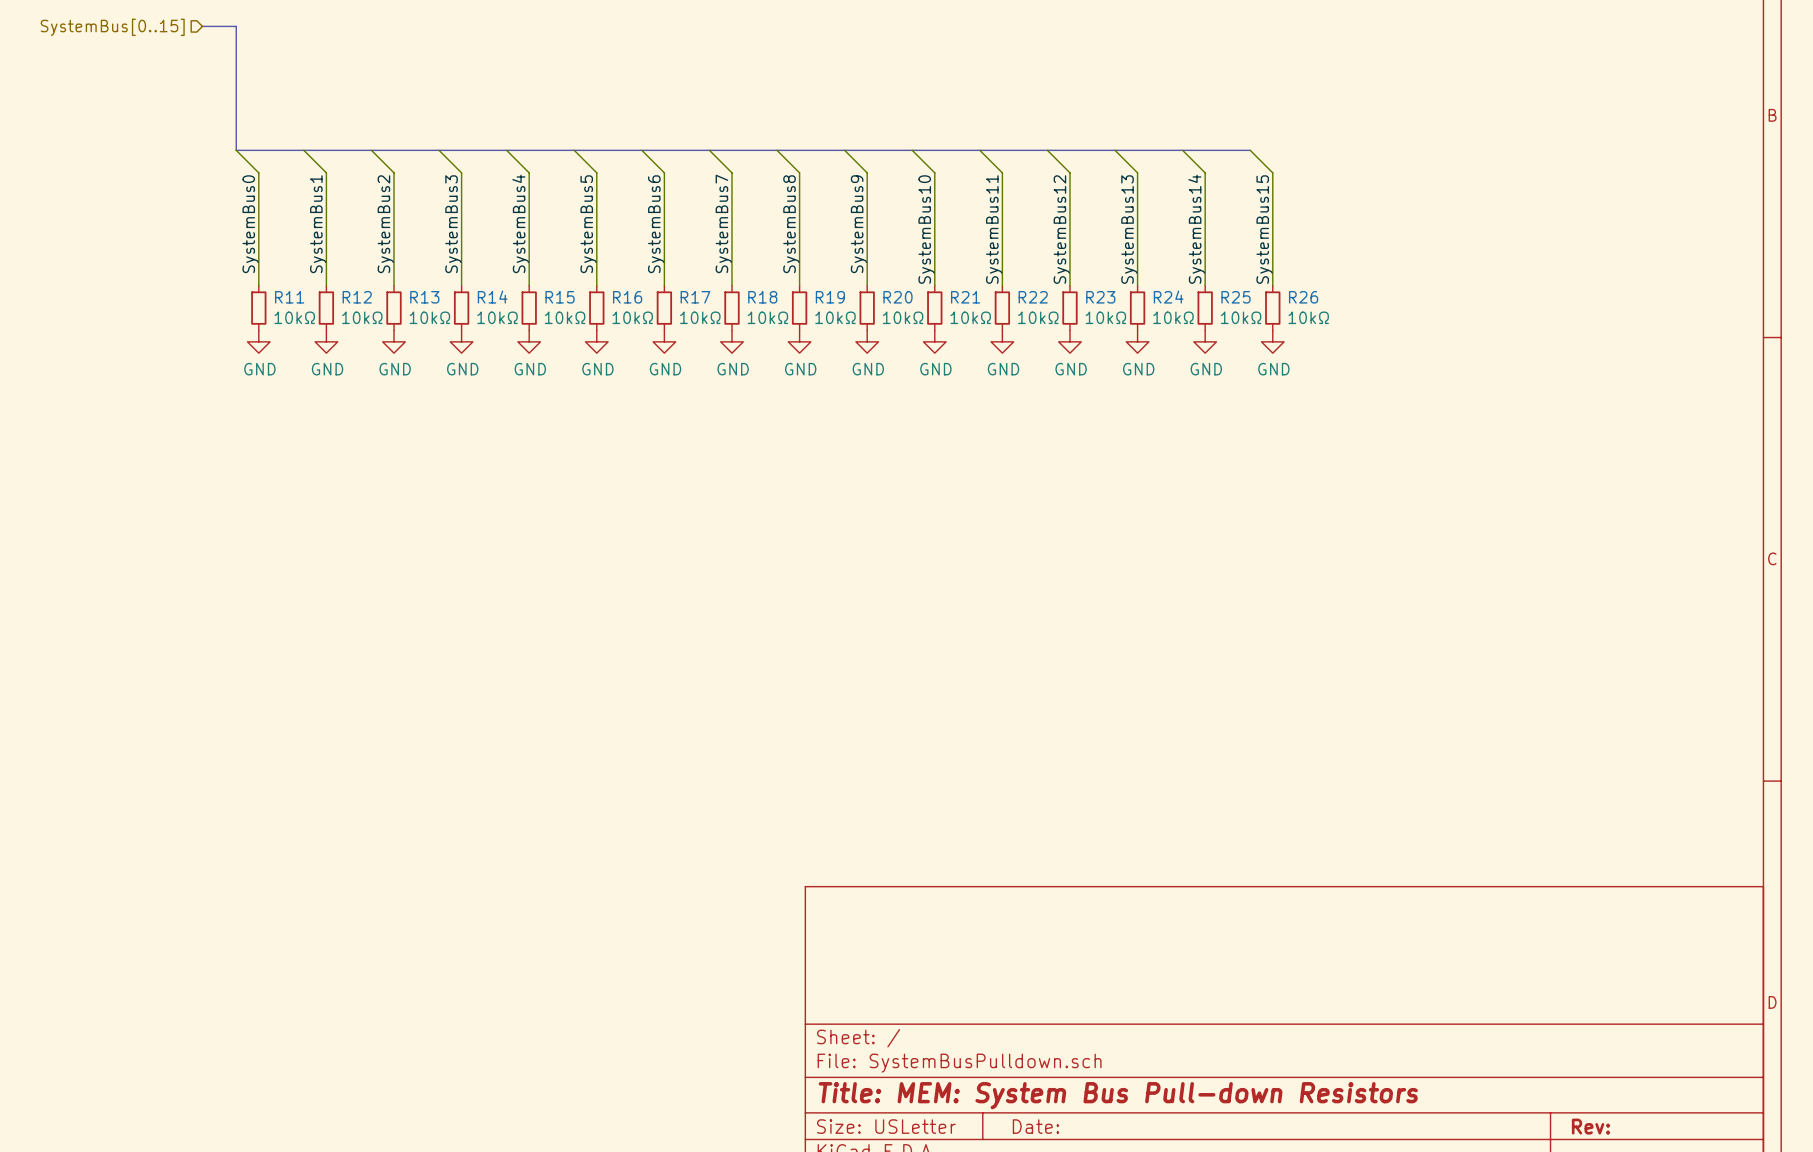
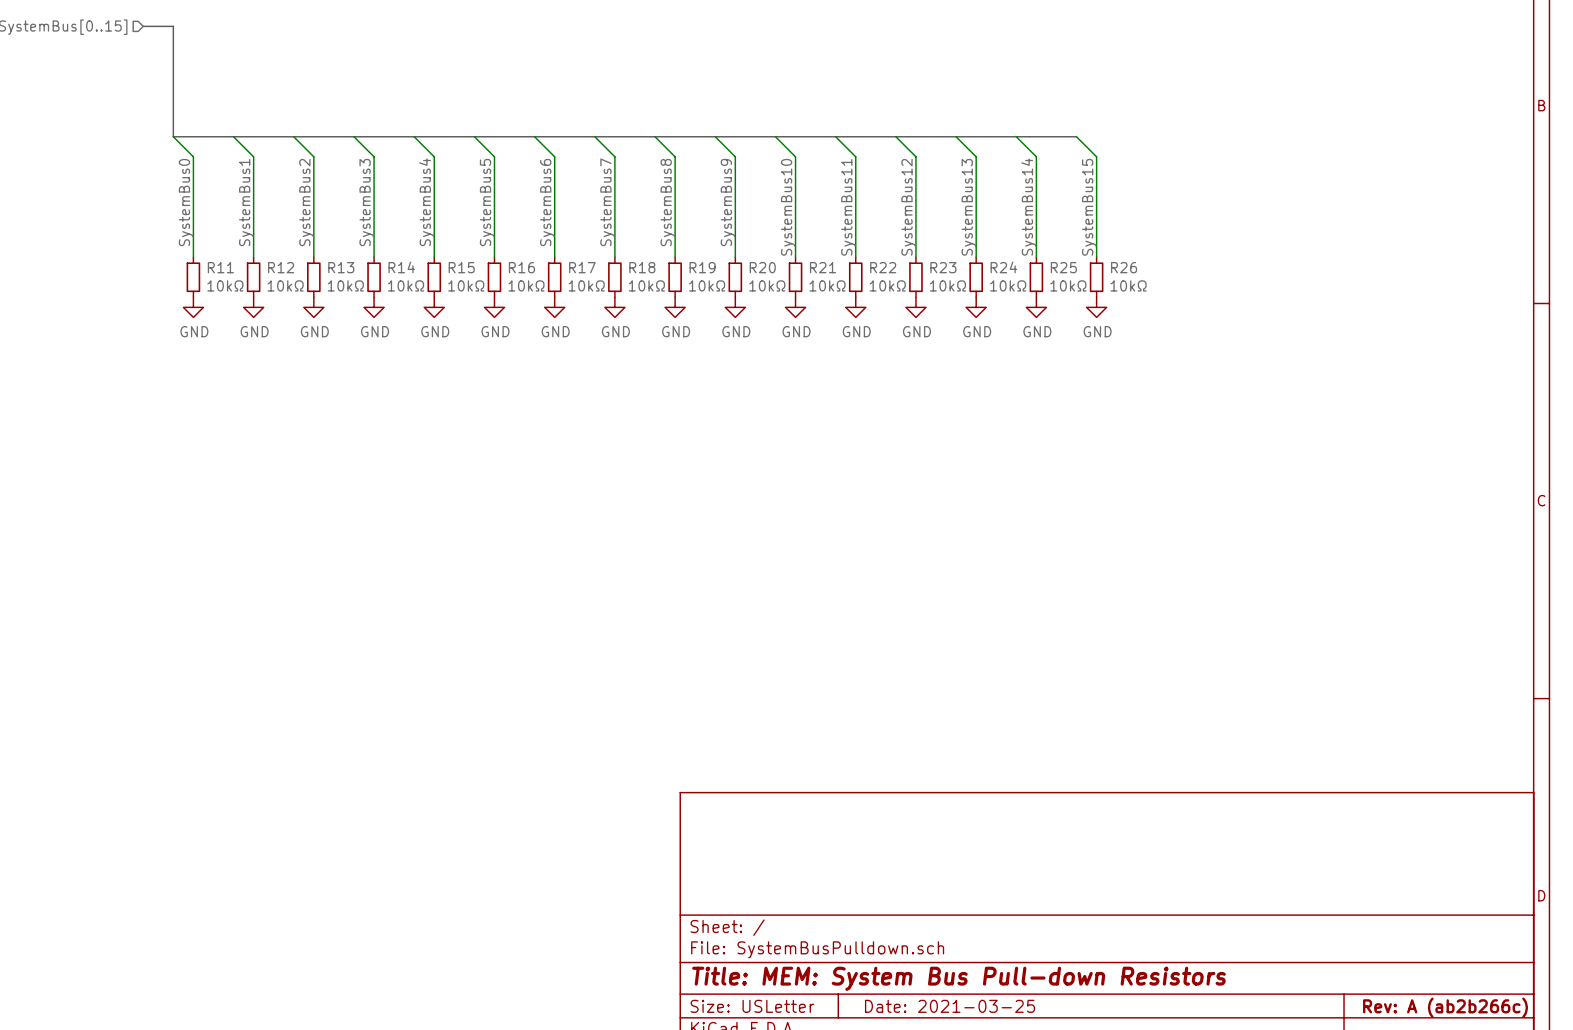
title block: Date: (1035, 1126) -> Date: 2021-03-25 (949, 1006)
title block: Rev: (1590, 1126) -> Rev: A (ab2b266c) (1445, 1007)

